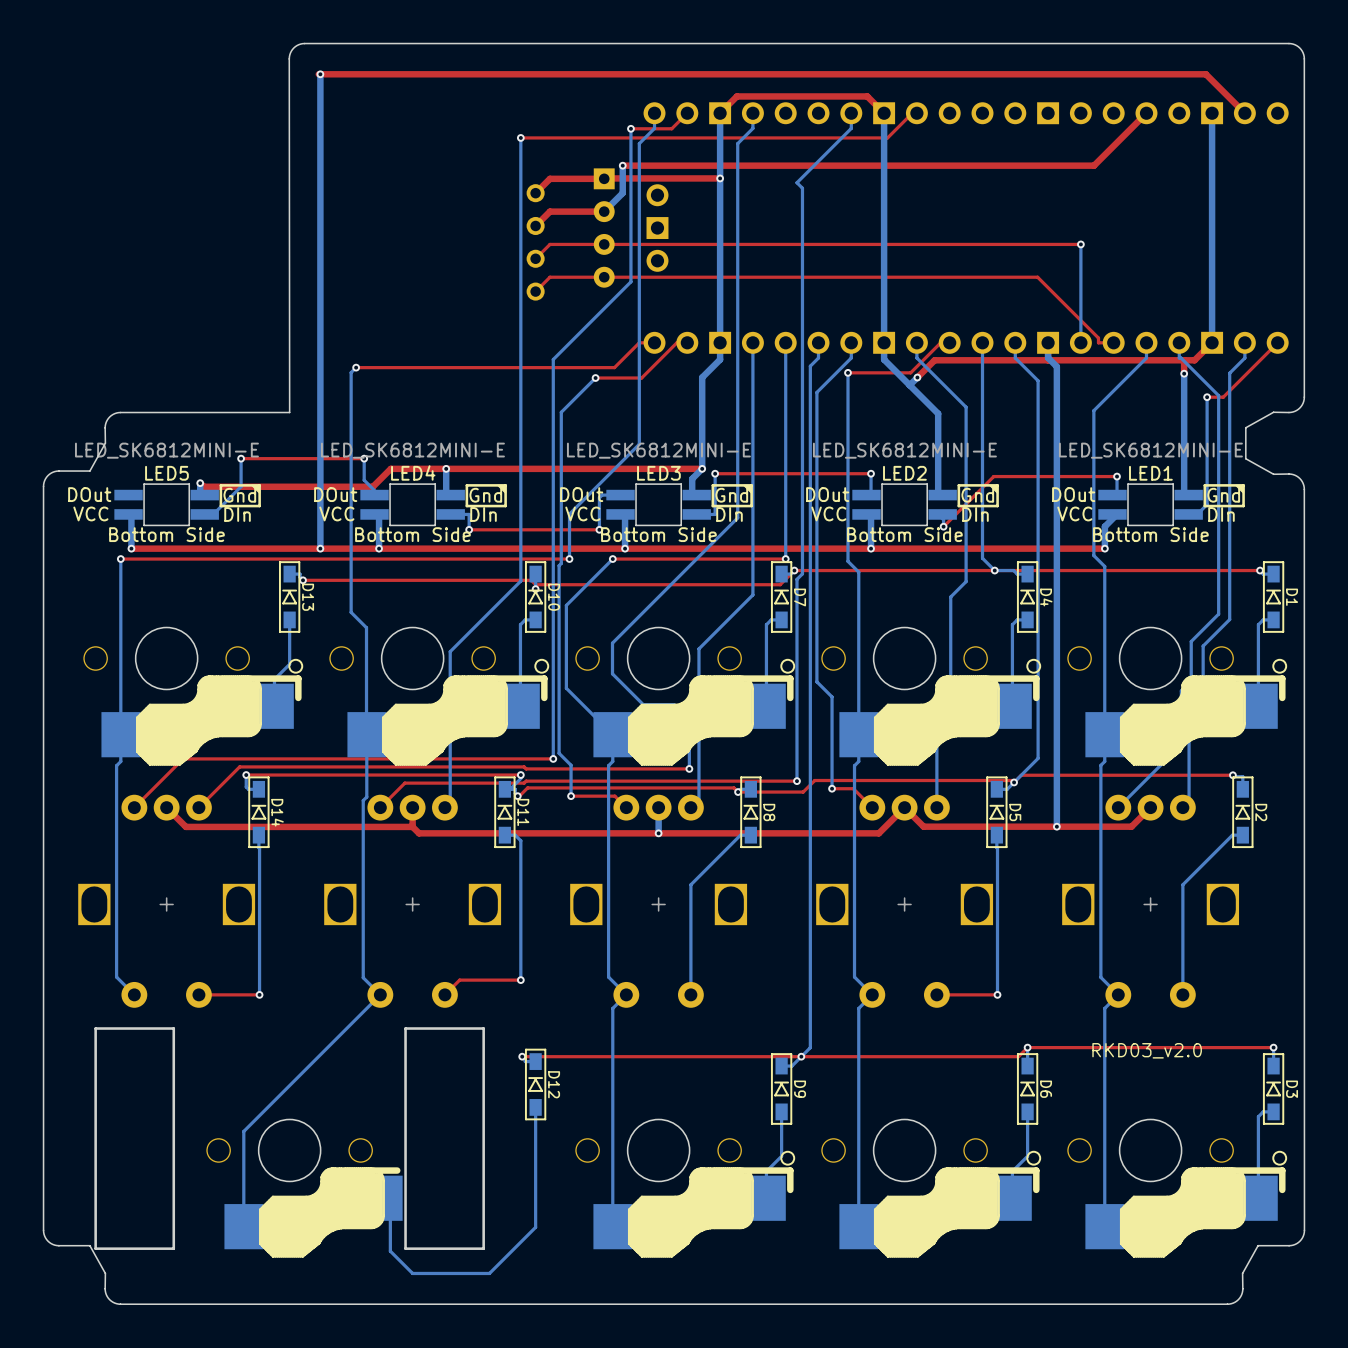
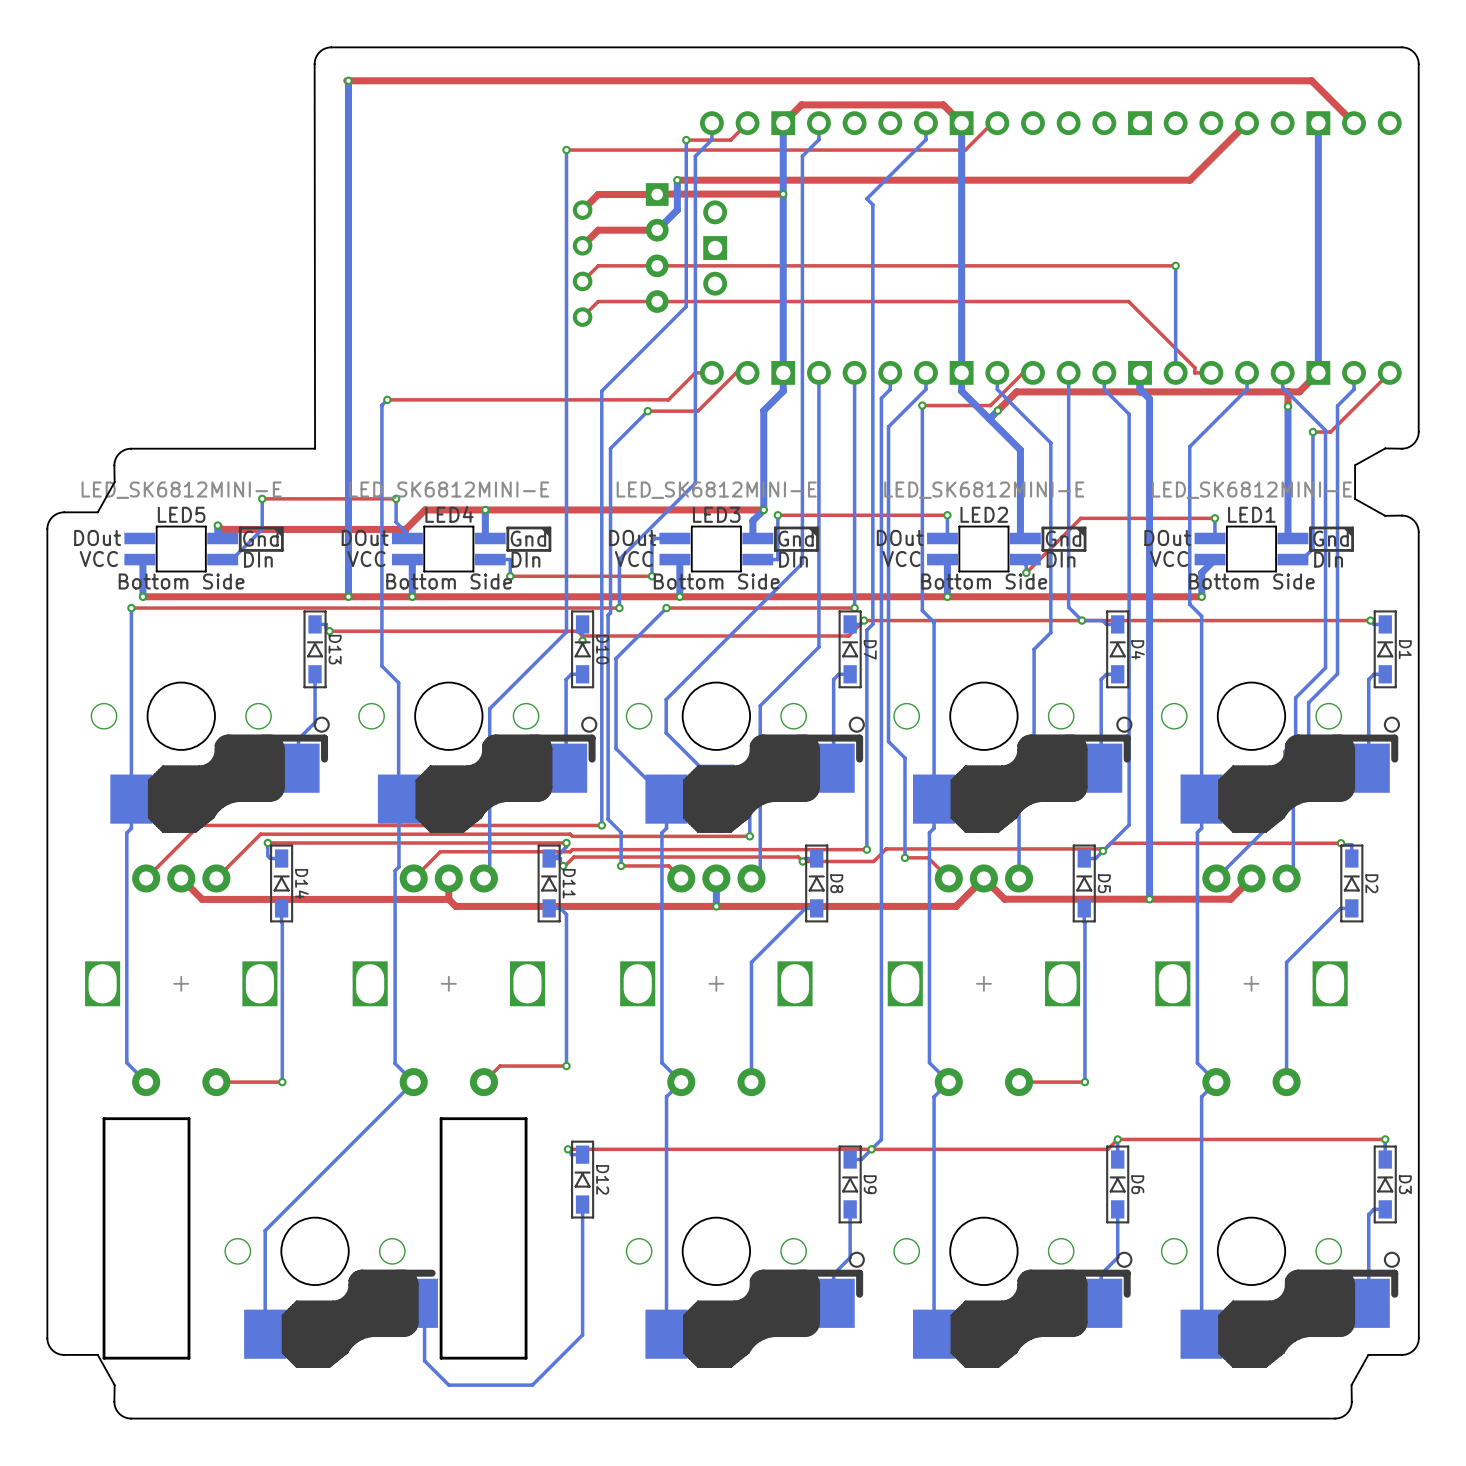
text: RKD03_v2.0 (1147, 1050) -> none

